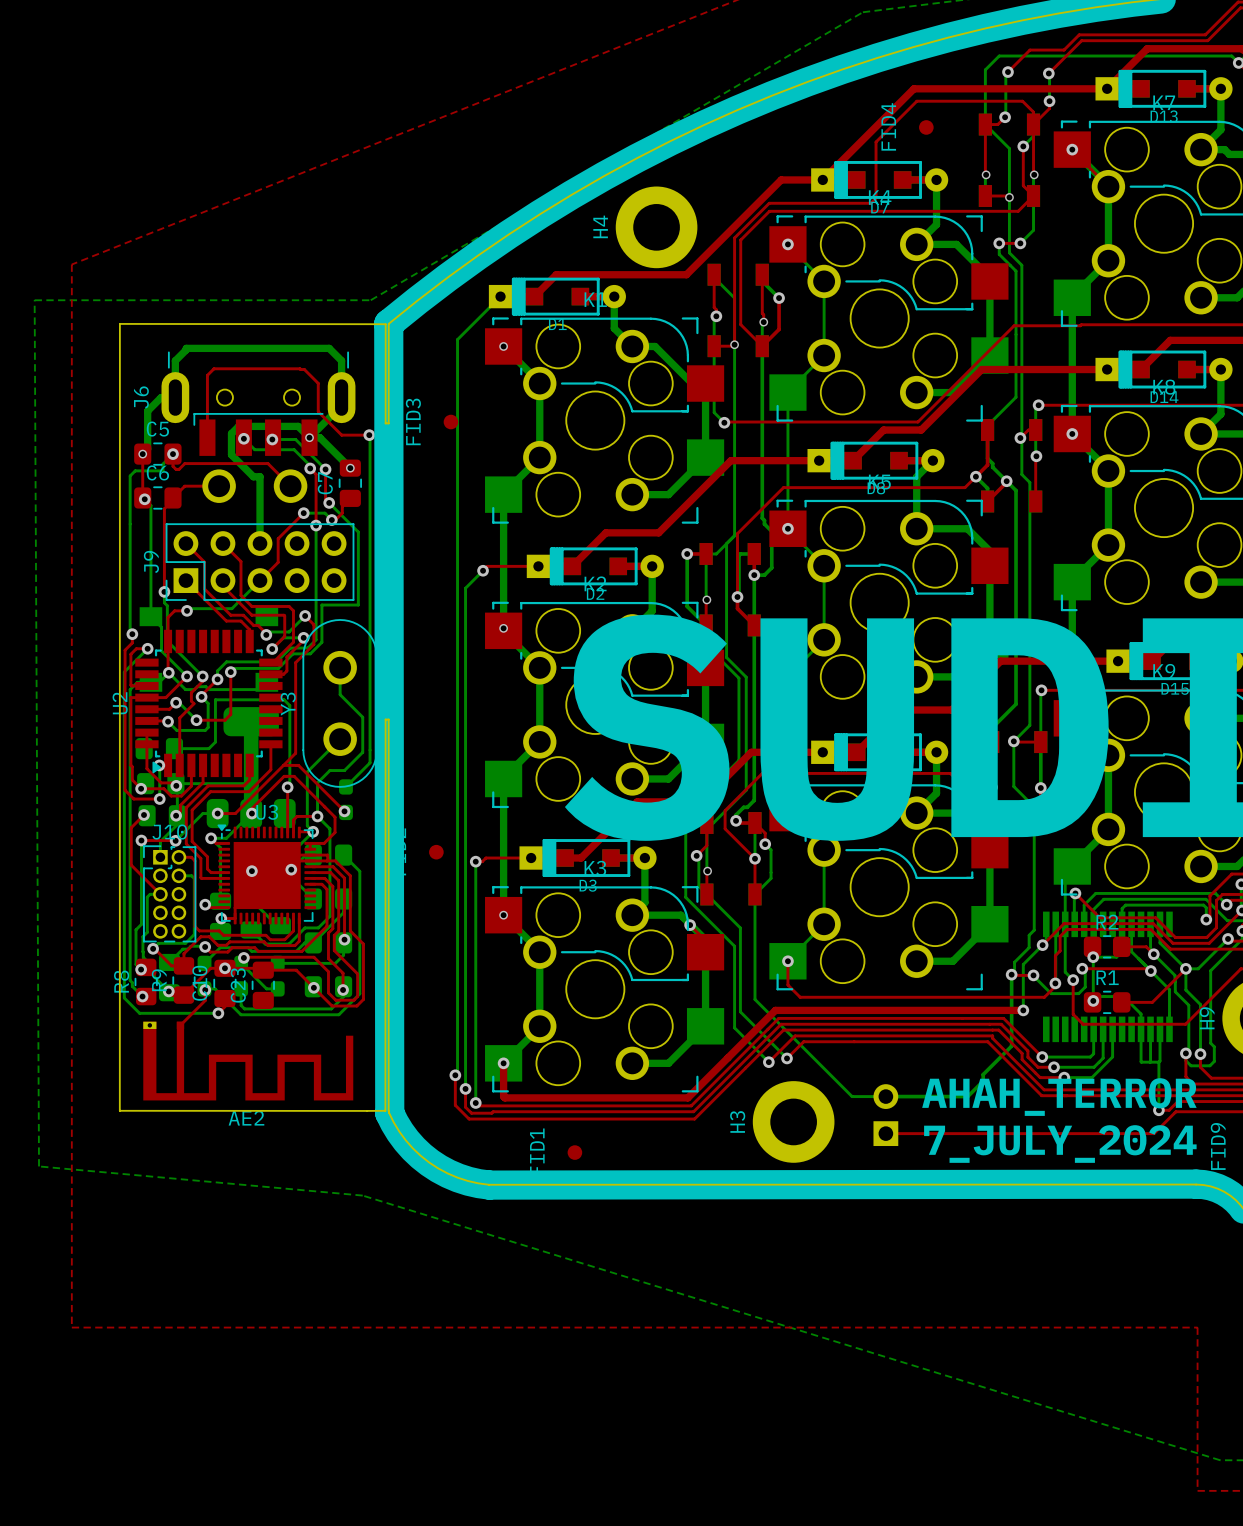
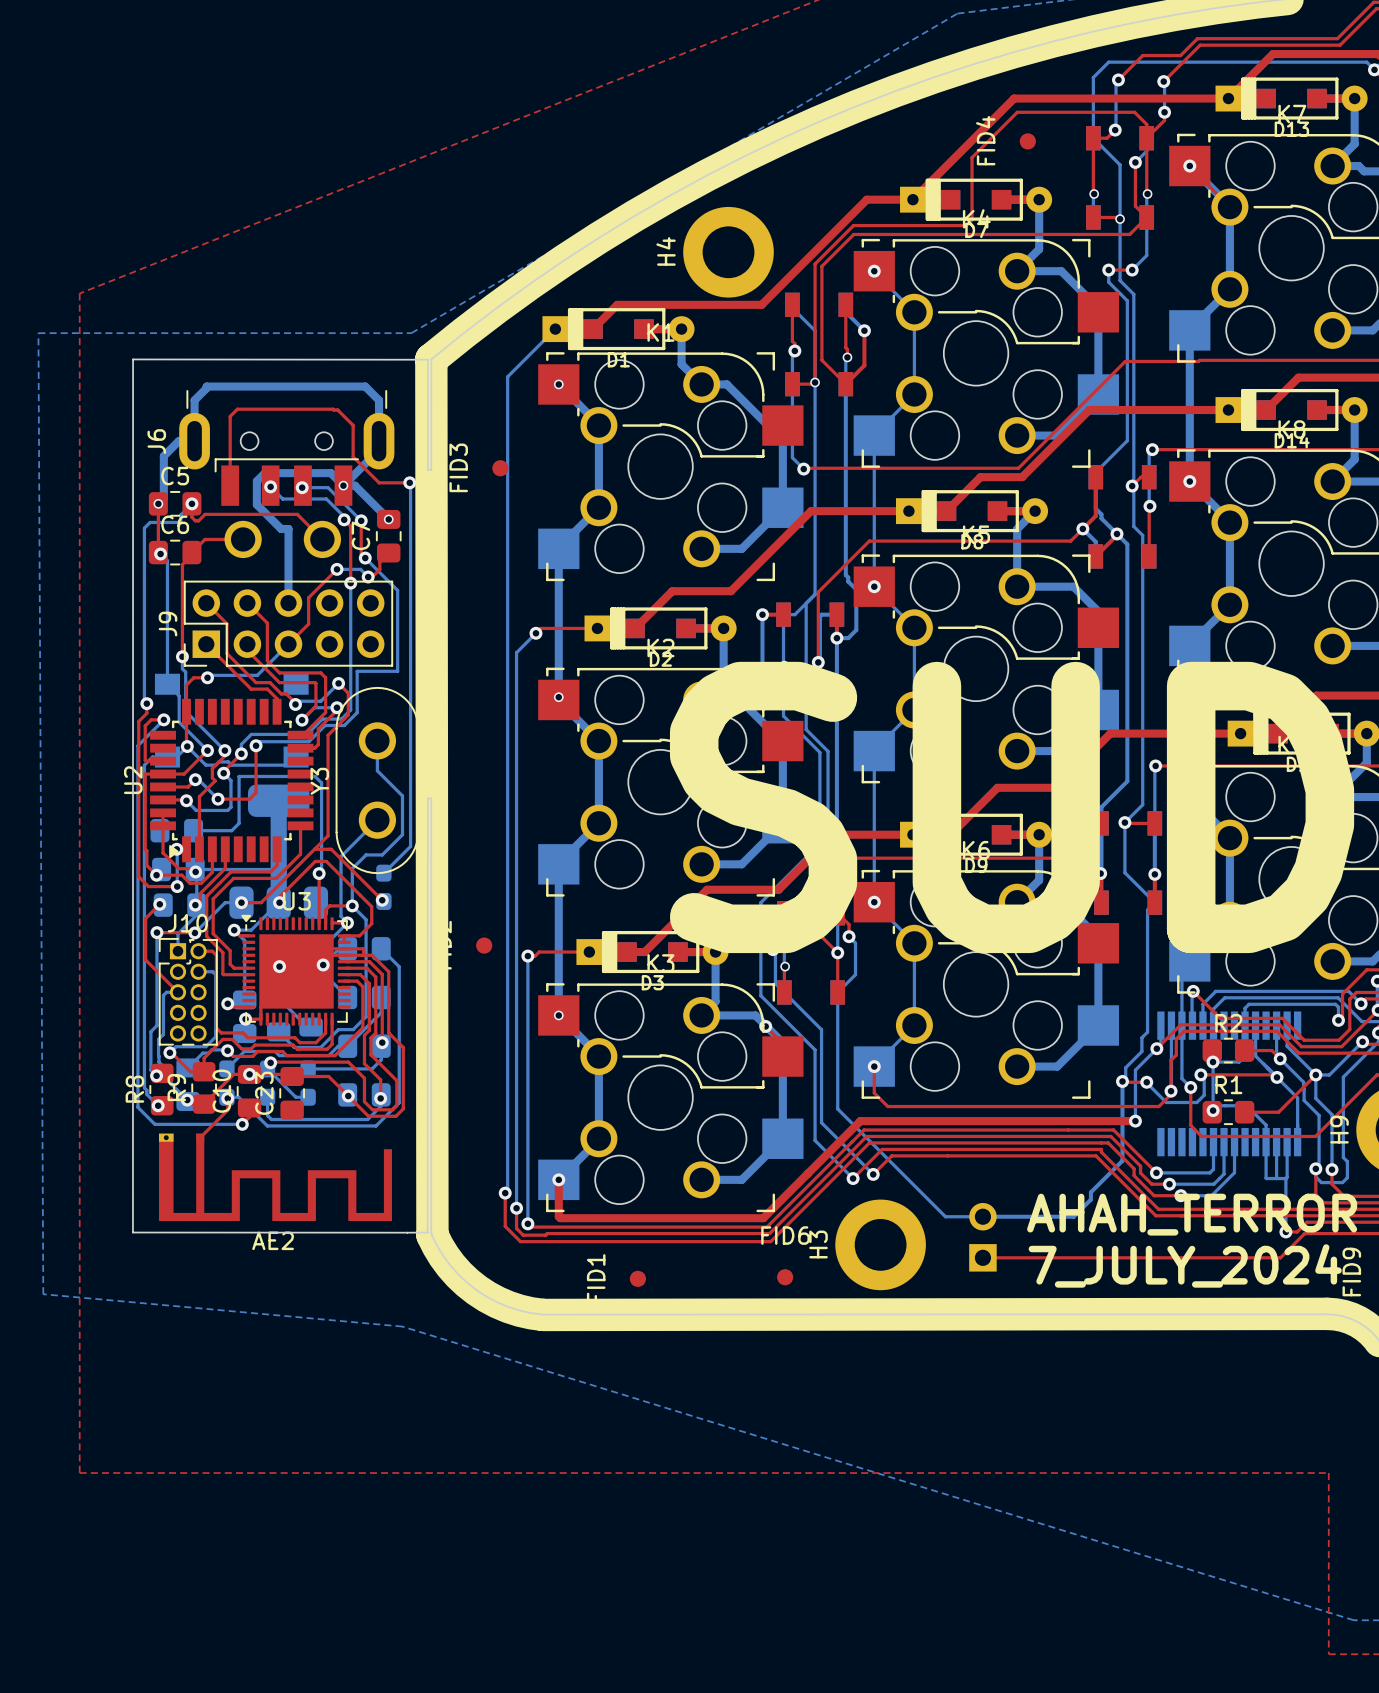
FID6: none -> (785, 1277)

